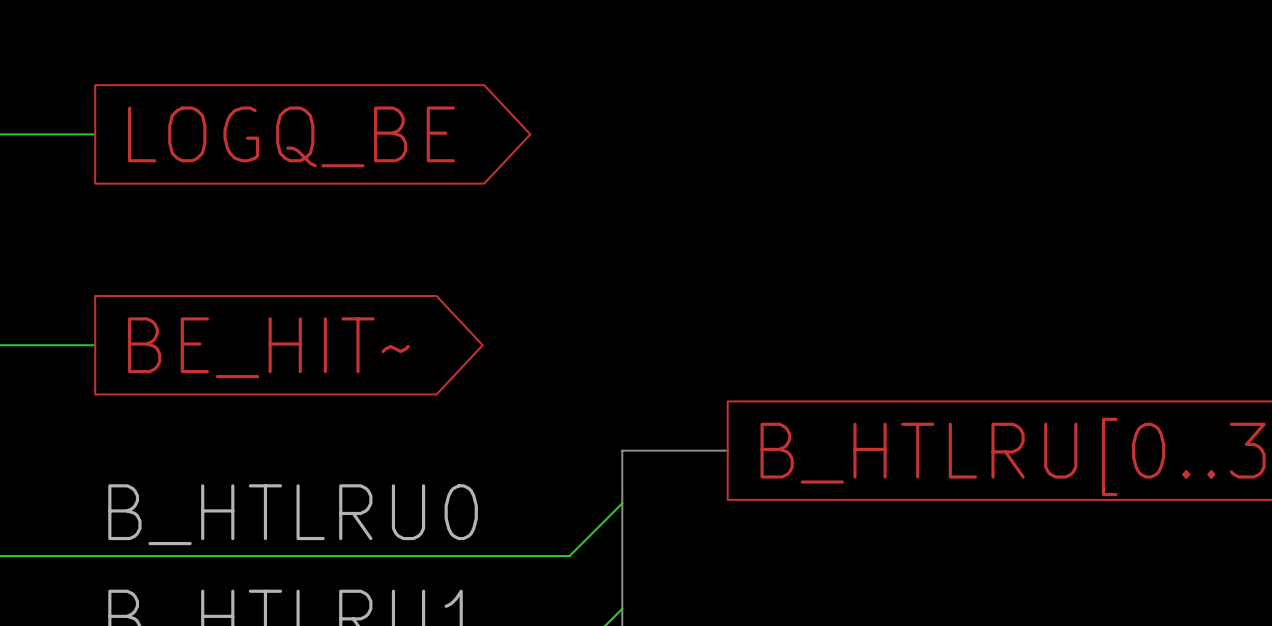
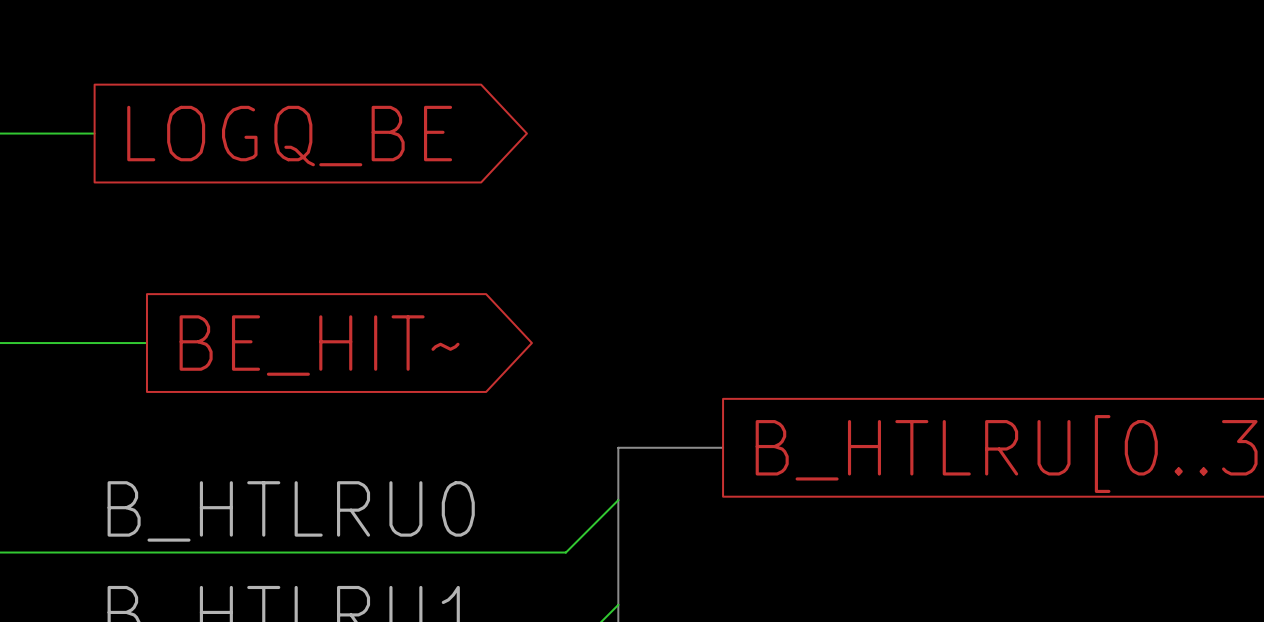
wire: none -> (94, 343) (146, 343)
global label position: BE_HIT~ (268, 347) -> BE_HIT~ (319, 345)

